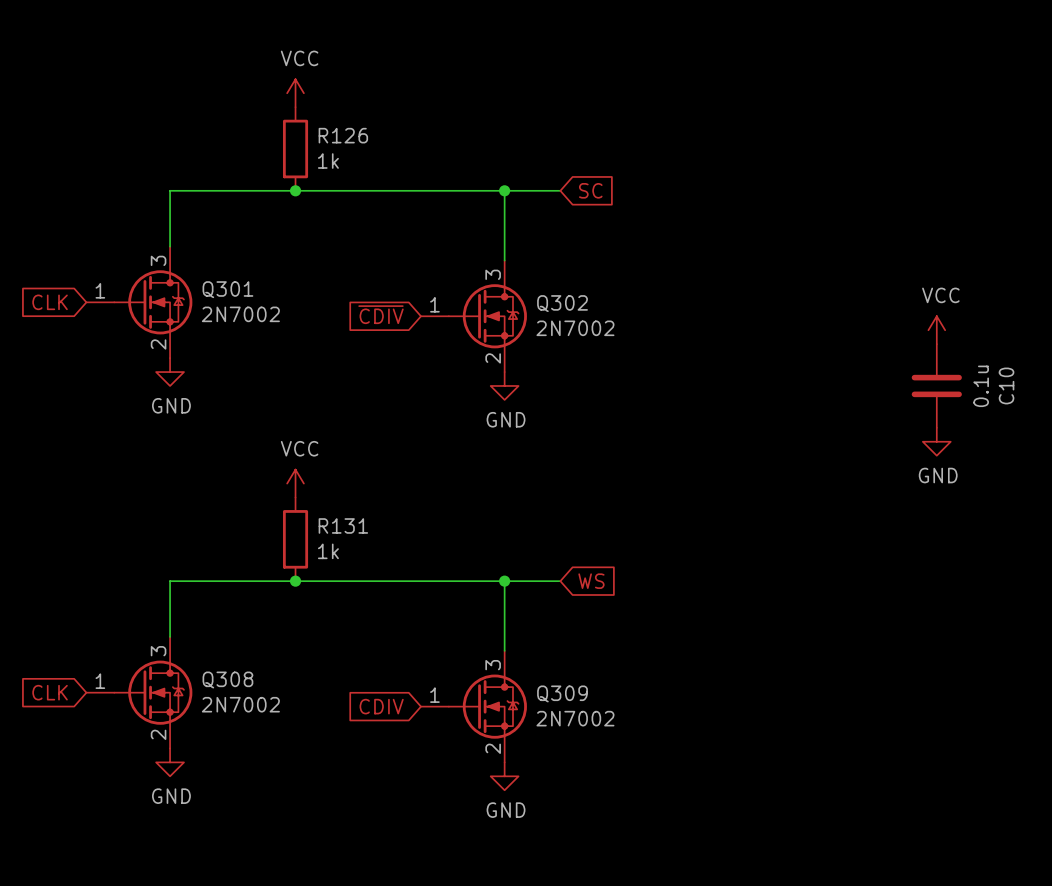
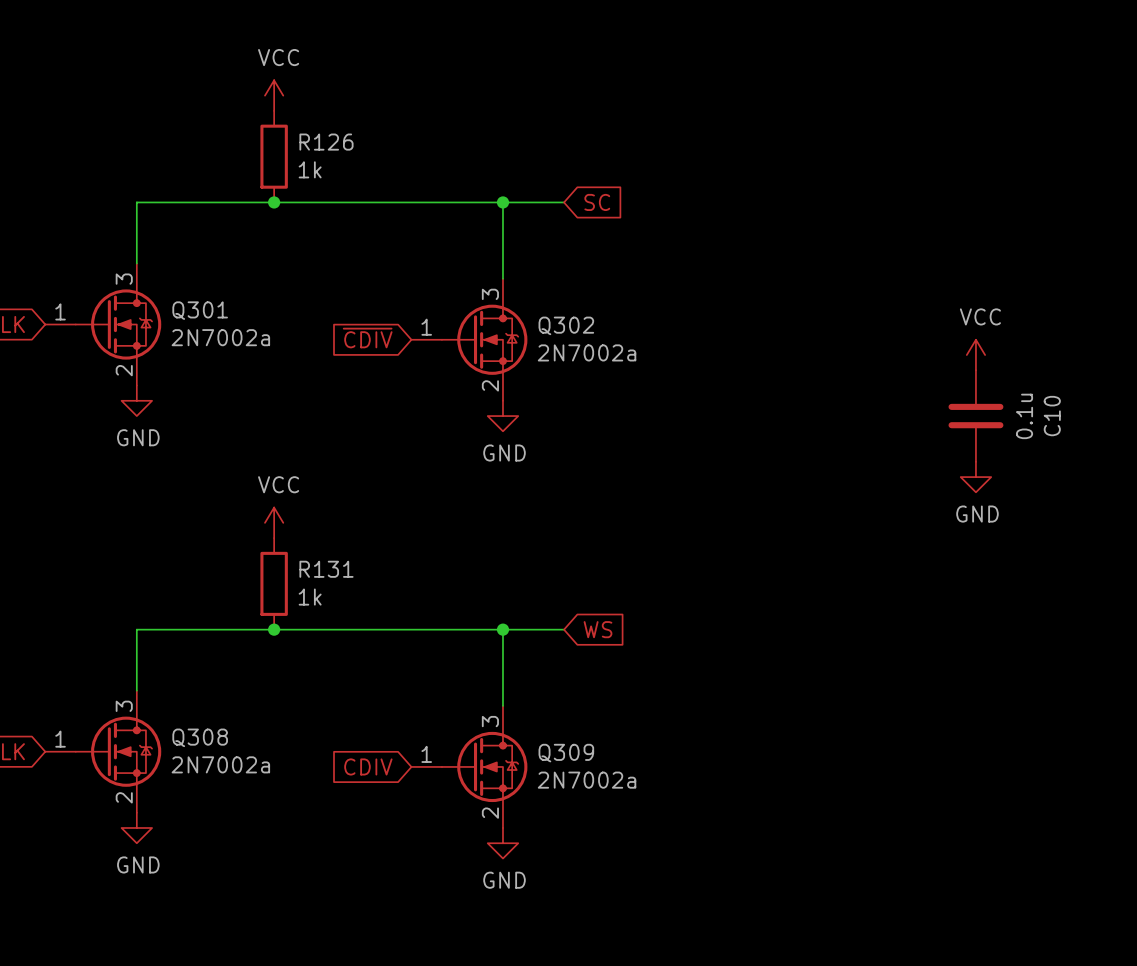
Q301 value: 2N7002 (240, 314) -> 2N7002a (220, 337)
Q302 value: 2N7002 (575, 328) -> 2N7002a (587, 352)
Q308 value: 2N7002 (240, 704) -> 2N7002a (220, 764)
Q309 value: 2N7002 (575, 718) -> 2N7002a (587, 780)

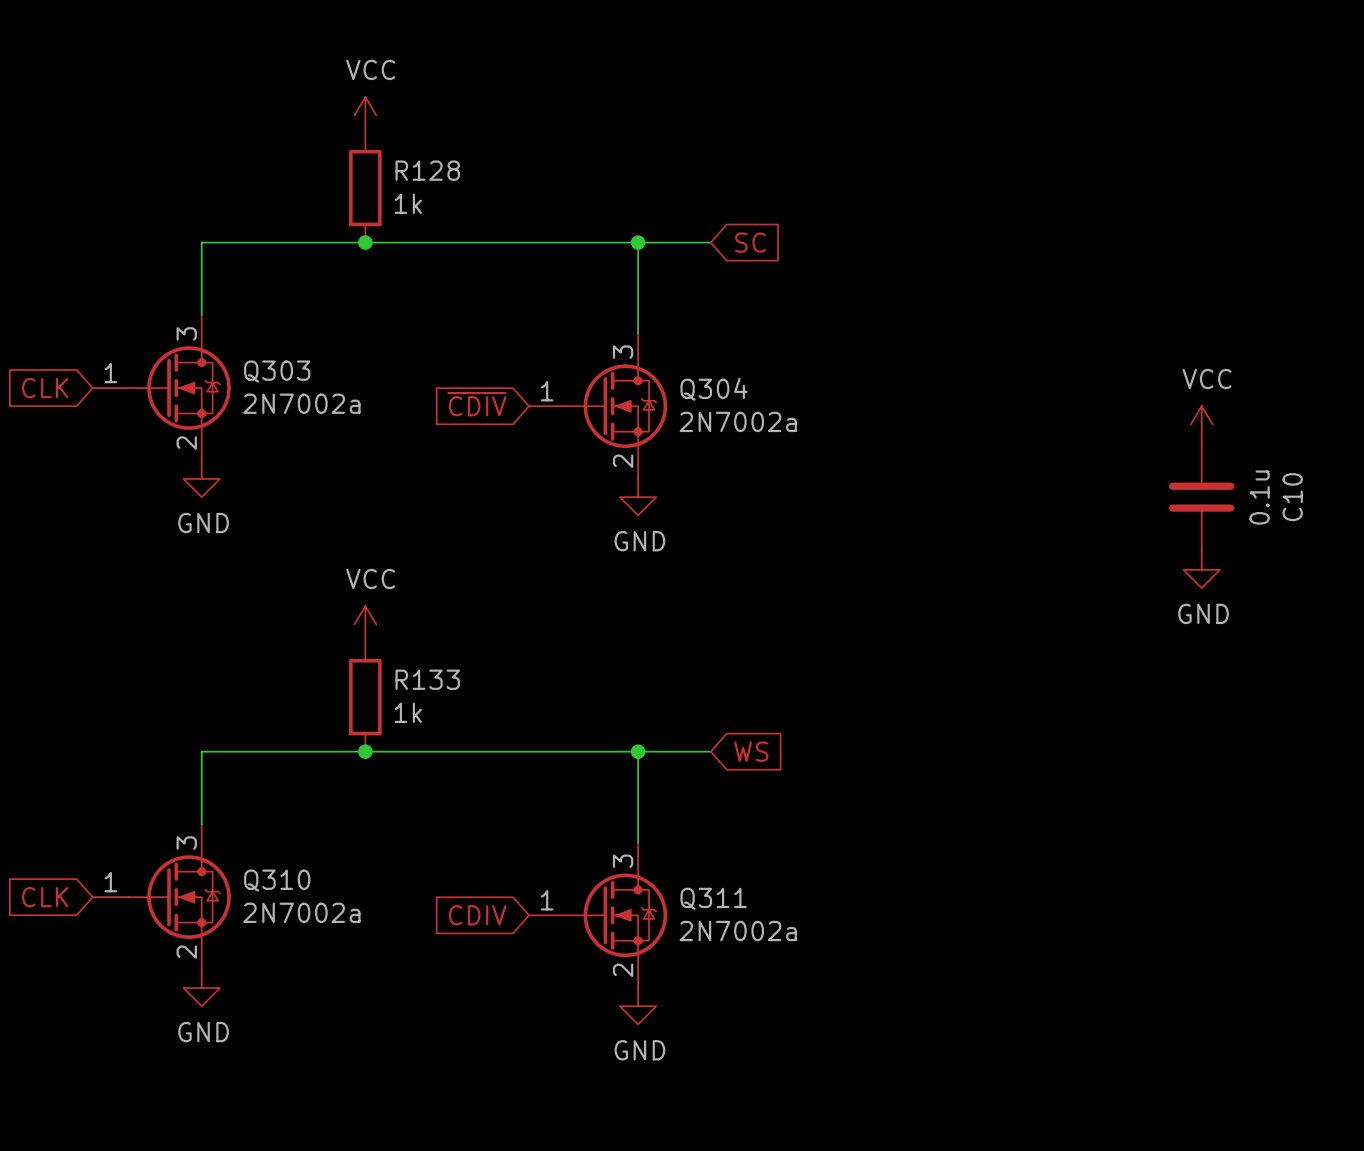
R126 name: R126 (326, 142) -> R128 (427, 170)
Q301 name: Q301 (200, 310) -> Q303 (277, 371)
Q302 name: Q302 (566, 325) -> Q304 (714, 389)
R131 name: R131 (326, 569) -> R133 (427, 679)
Q308 name: Q308 (200, 737) -> Q310 (277, 880)
Q309 name: Q309 (566, 753) -> Q311 (713, 898)

